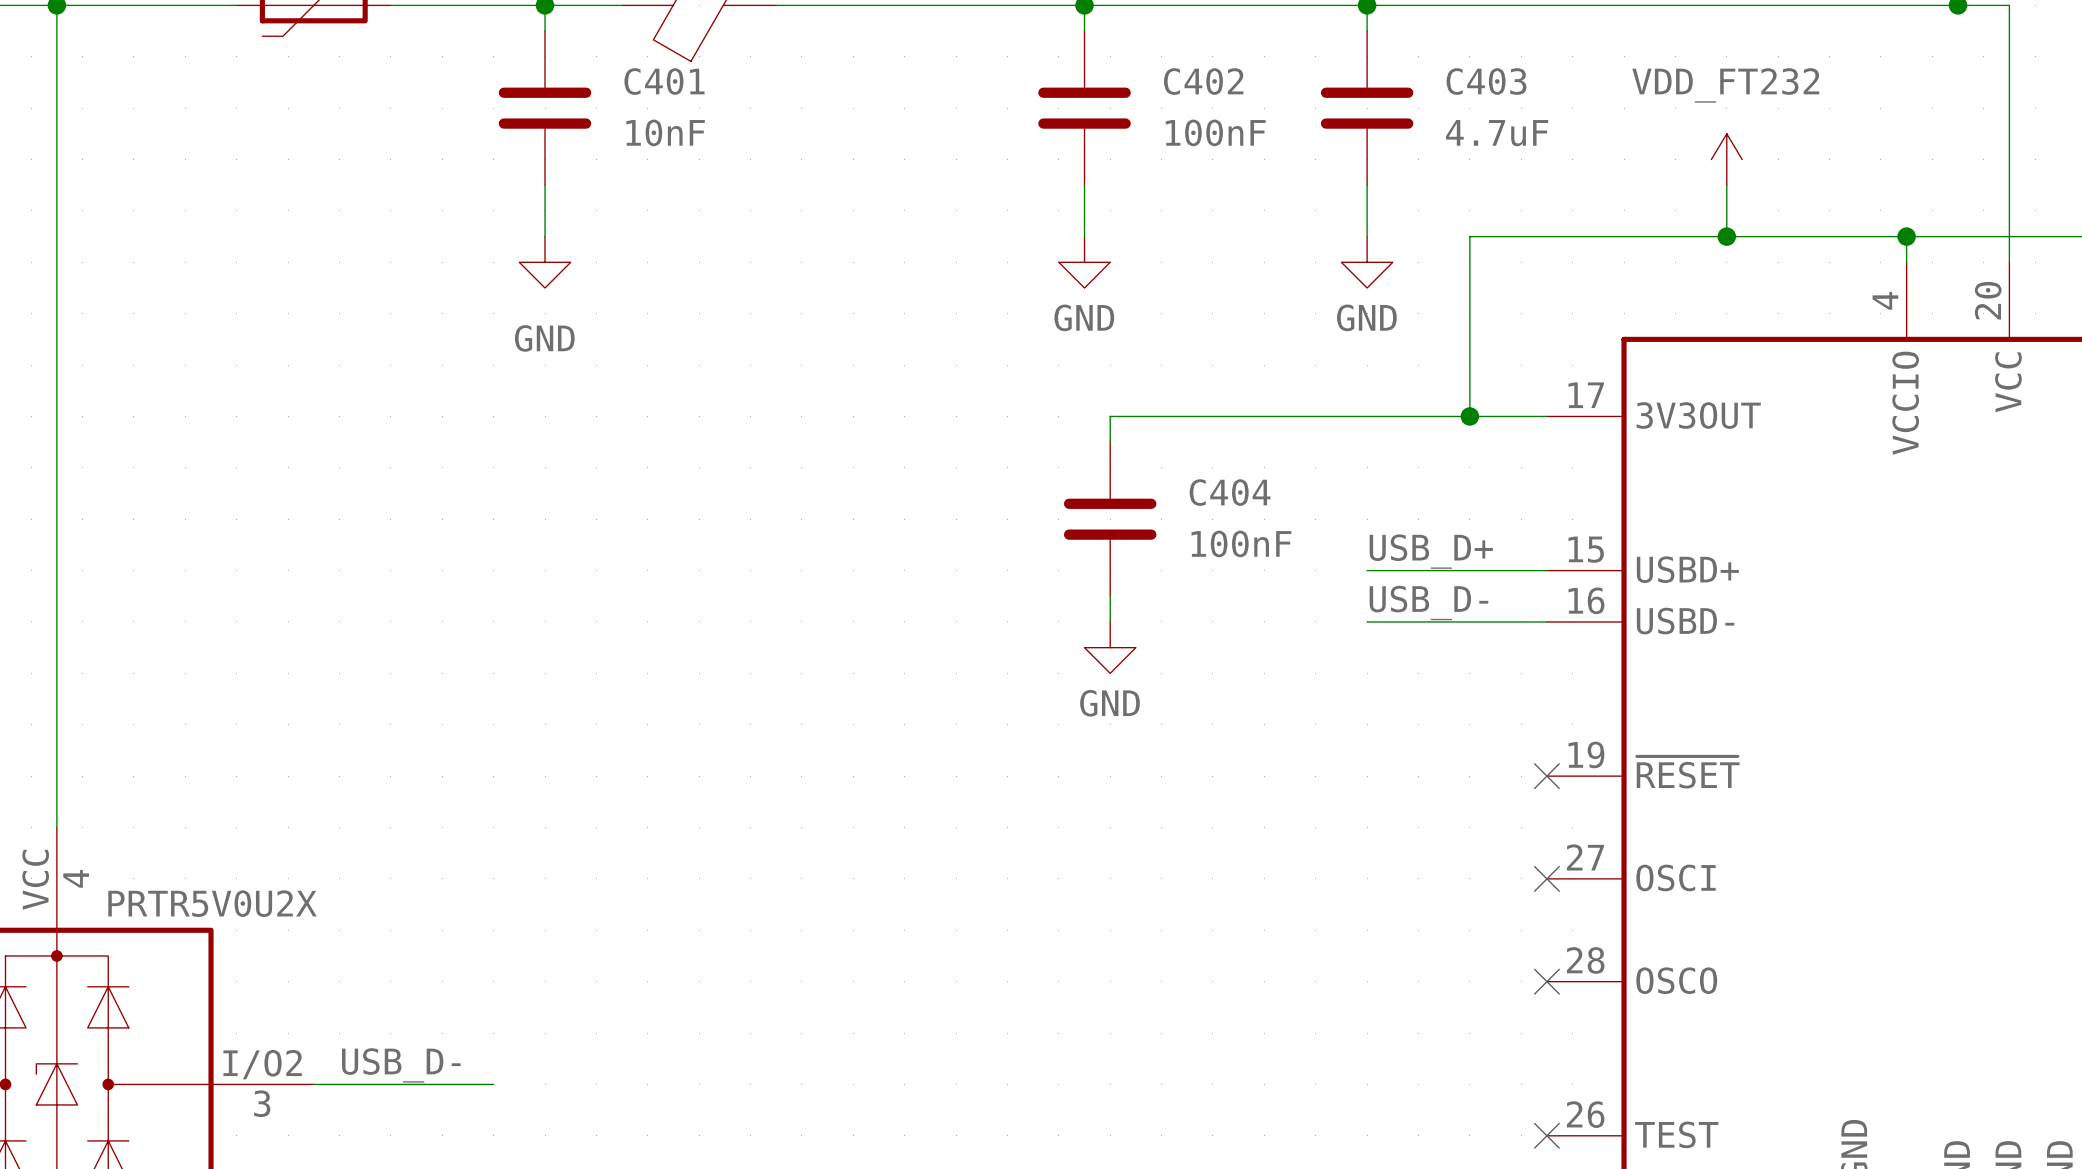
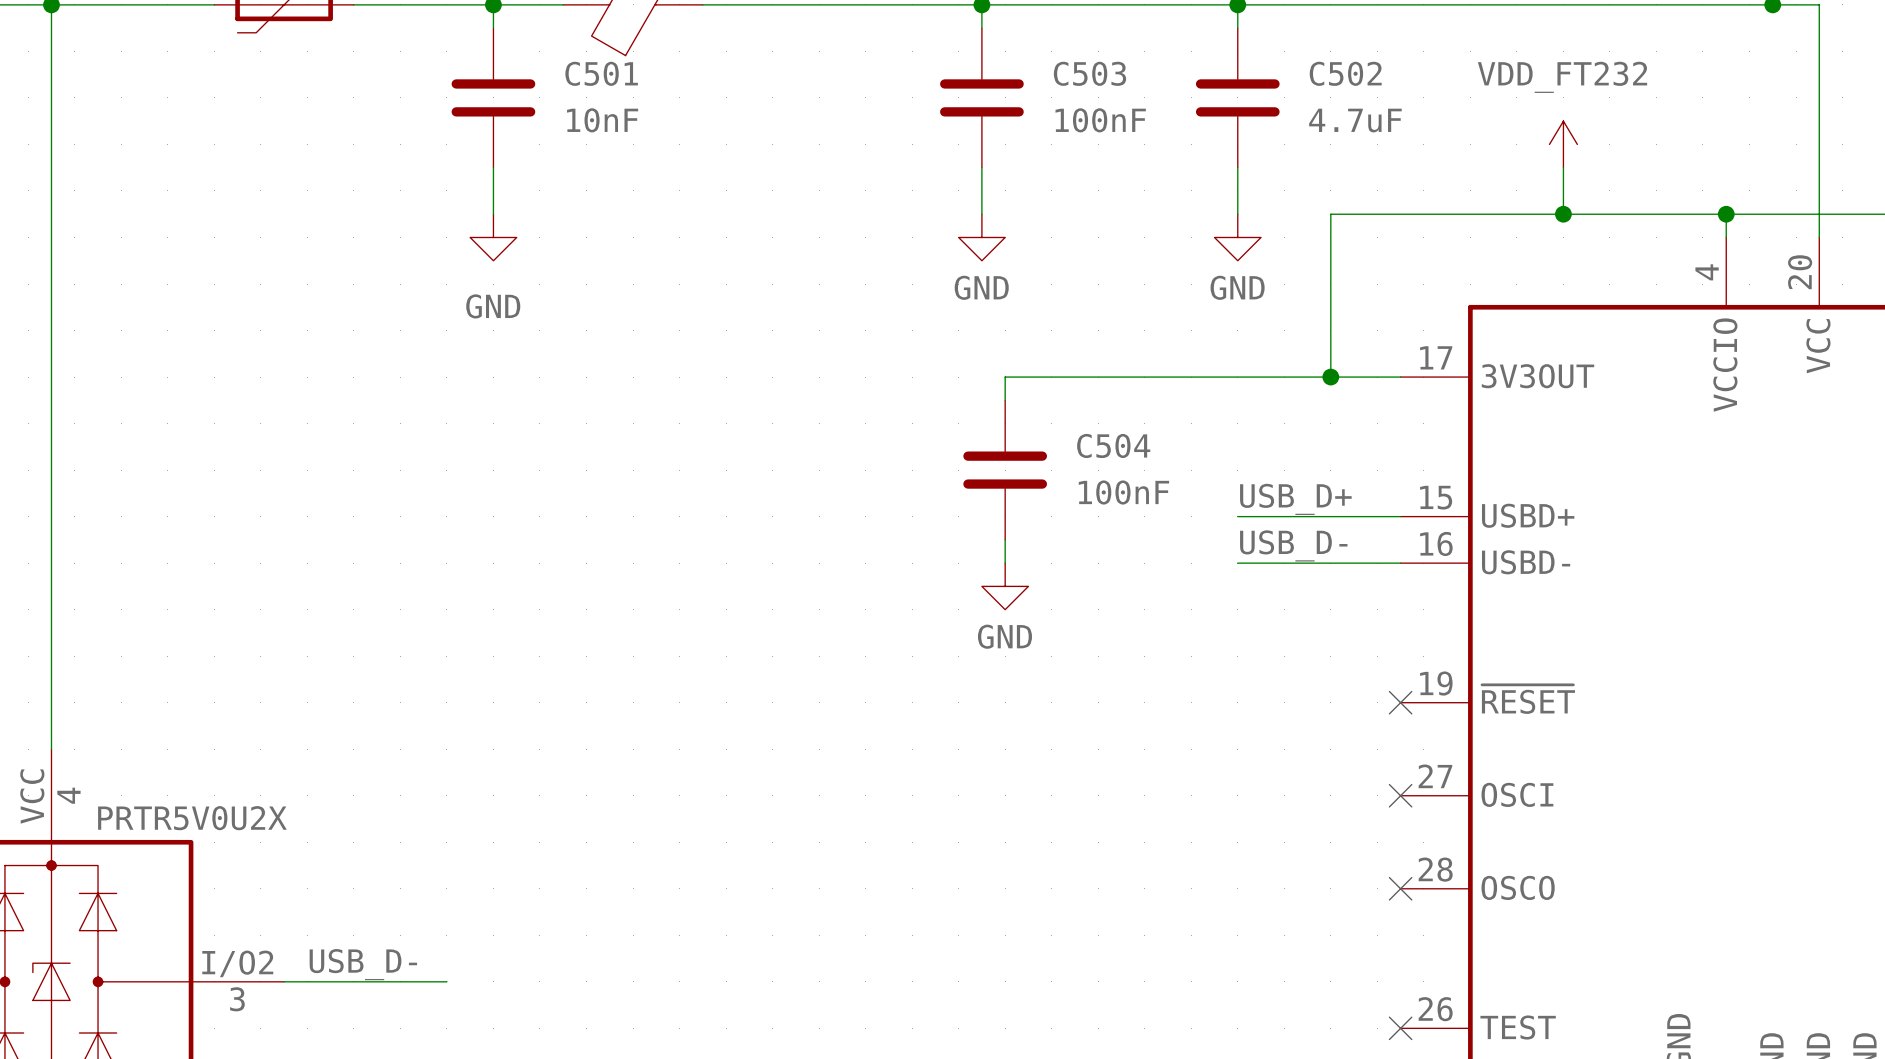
C401 name: C401 (664, 81) -> C501 (601, 73)
C402 name: C402 (1203, 81) -> C503 (1089, 73)
C403 name: C403 (1486, 81) -> C502 (1345, 73)
C404 name: C404 (1230, 492) -> C504 (1113, 445)

